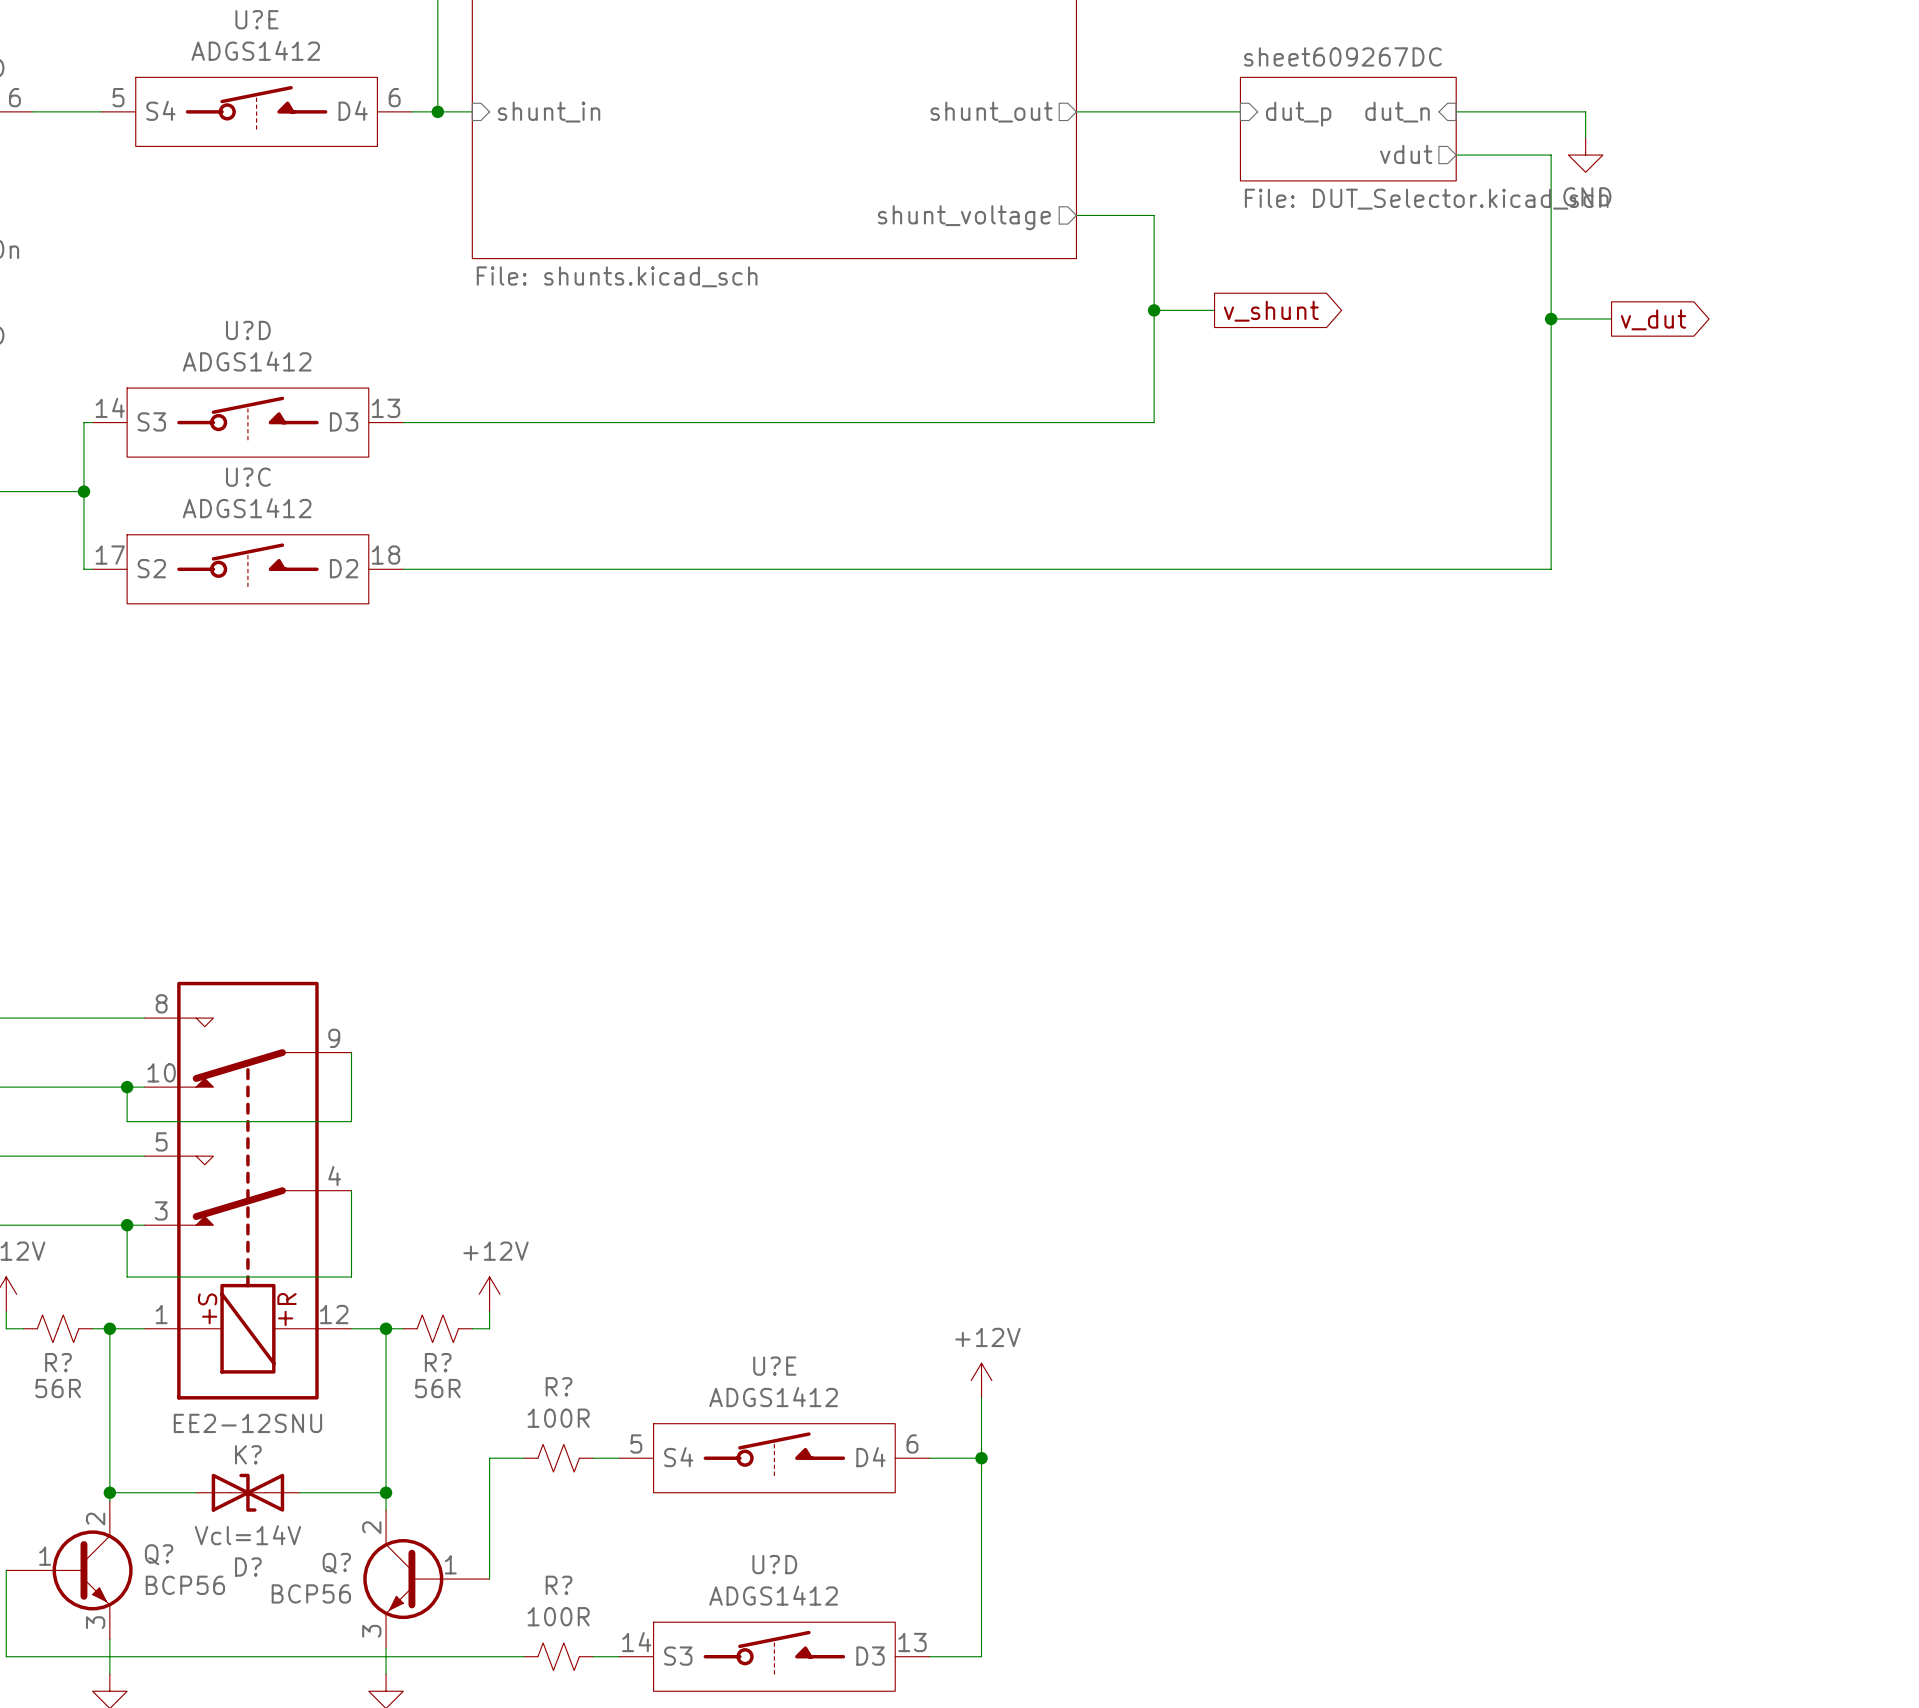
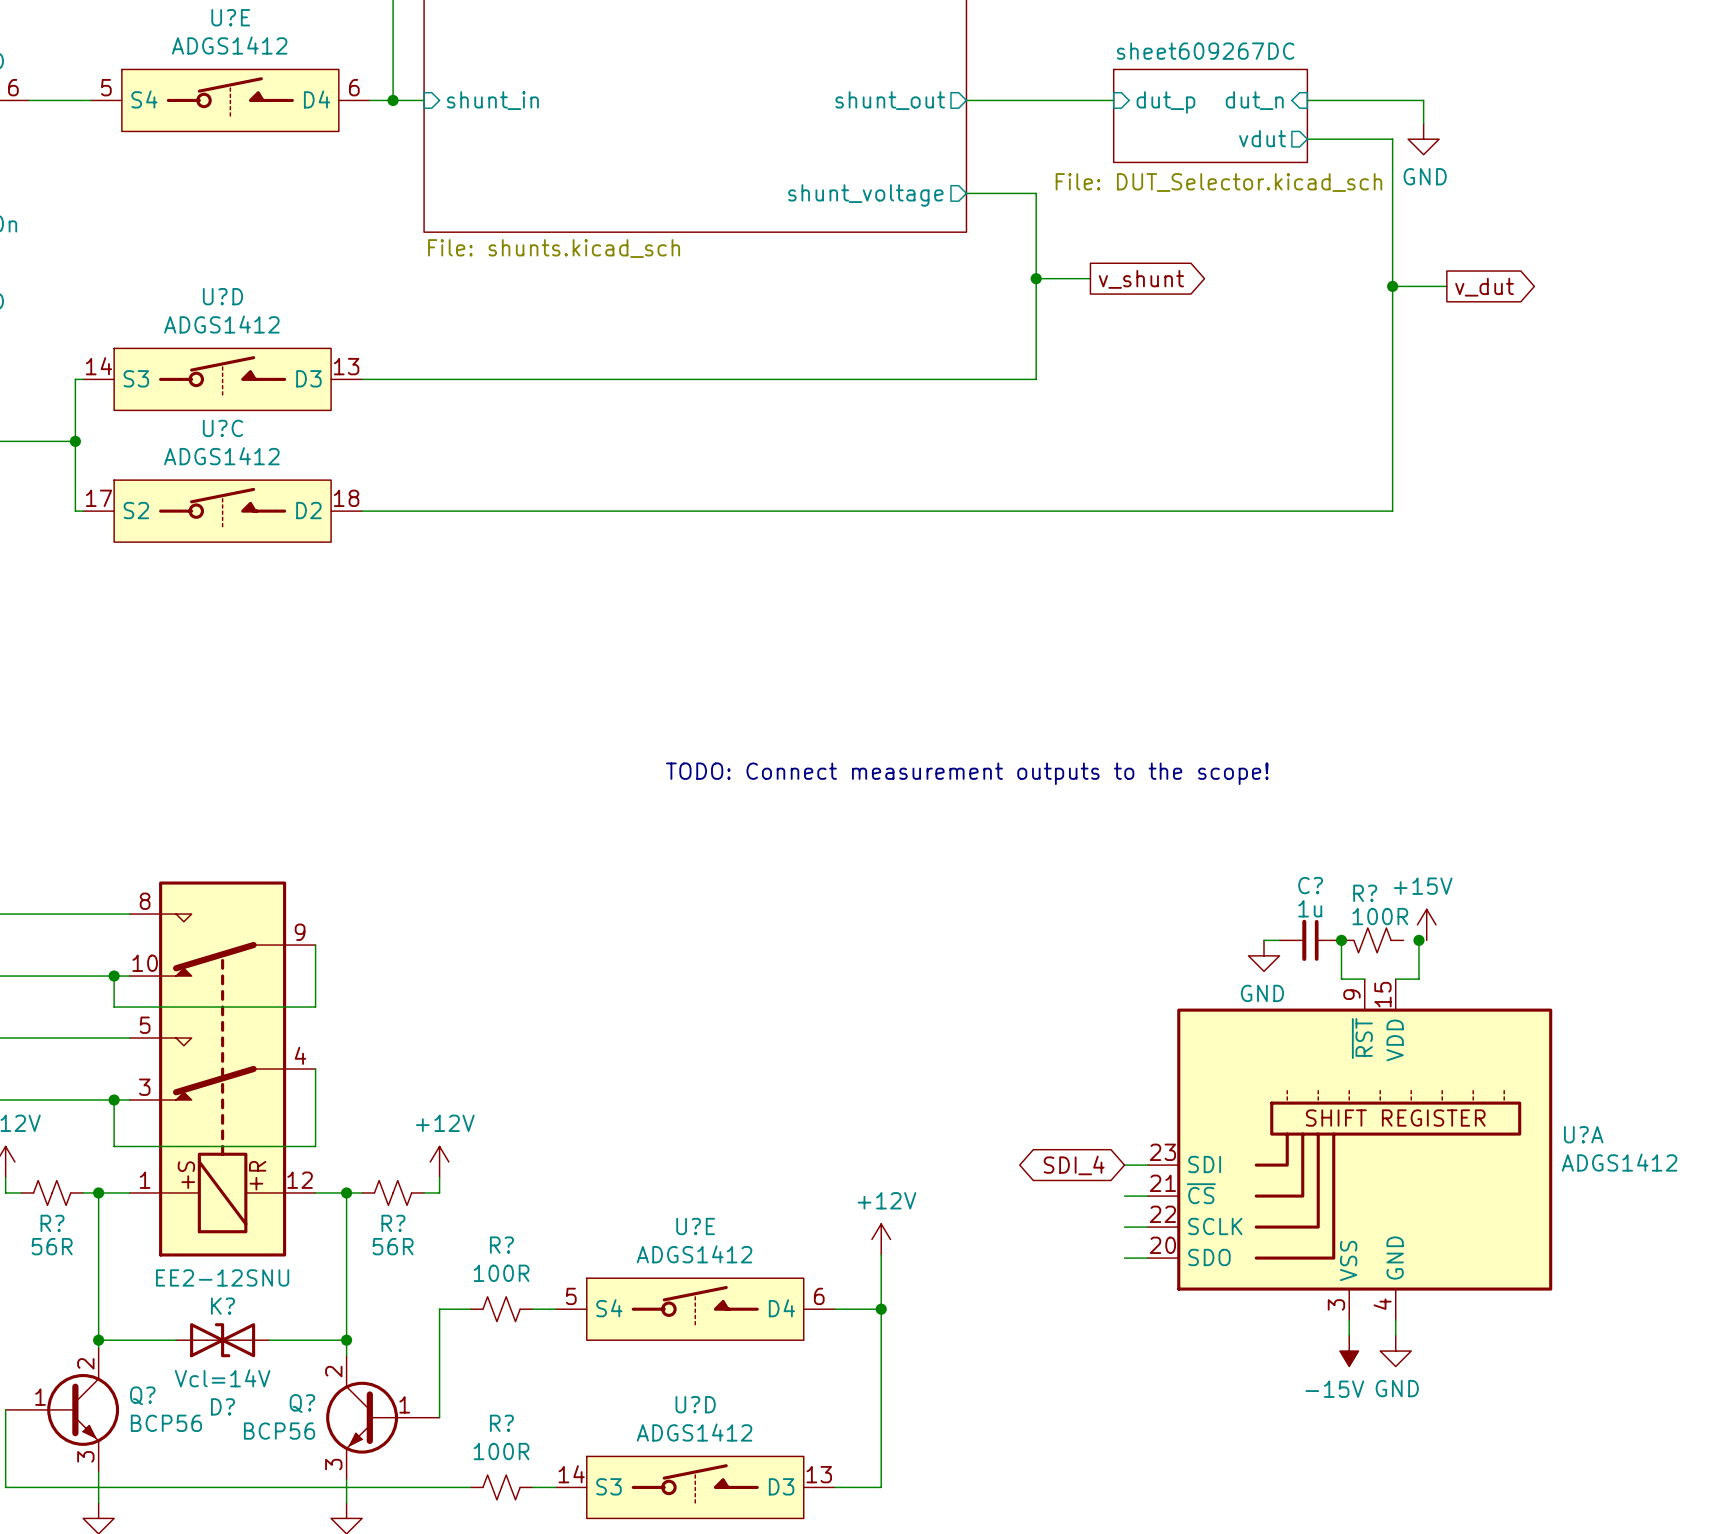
sheet sheet609267DC value position: File: DUT_Selector.kicad_sch (1426, 199) -> File: DUT_Selector.kicad_sch (1218, 182)
text: none -> TODO: Connect measurement outputs to the scope! (967, 773)
power symbol: none -> +15V (1426, 924)
wire: none -> (1264, 940) (1279, 940)
C?: none -> 1u (1310, 940)
wire: none -> (1341, 940) (1341, 979) (1364, 979)
junction: none -> (1341, 940)
R?: none -> 100R (1372, 940)
wire: none -> (1418, 940) (1418, 979) (1395, 979)
junction: none -> (1418, 940)
power symbol: none -> GND (1264, 955)
U?A: none -> ADGS1412 (1350, 1149)
wire: none -> (1124, 1165) (1147, 1165)
global label: none -> SDI_4 (1074, 1165)
wire: none -> (1124, 1196) (1147, 1196)
wire: none -> (1124, 1227) (1147, 1227)
wire: none -> (1124, 1258) (1147, 1258)
wire: none -> (1349, 1320) (1349, 1335)
wire: none -> (1395, 1320) (1395, 1335)
power symbol: none -> -15V (1349, 1351)
power symbol: none -> GND (1395, 1351)

